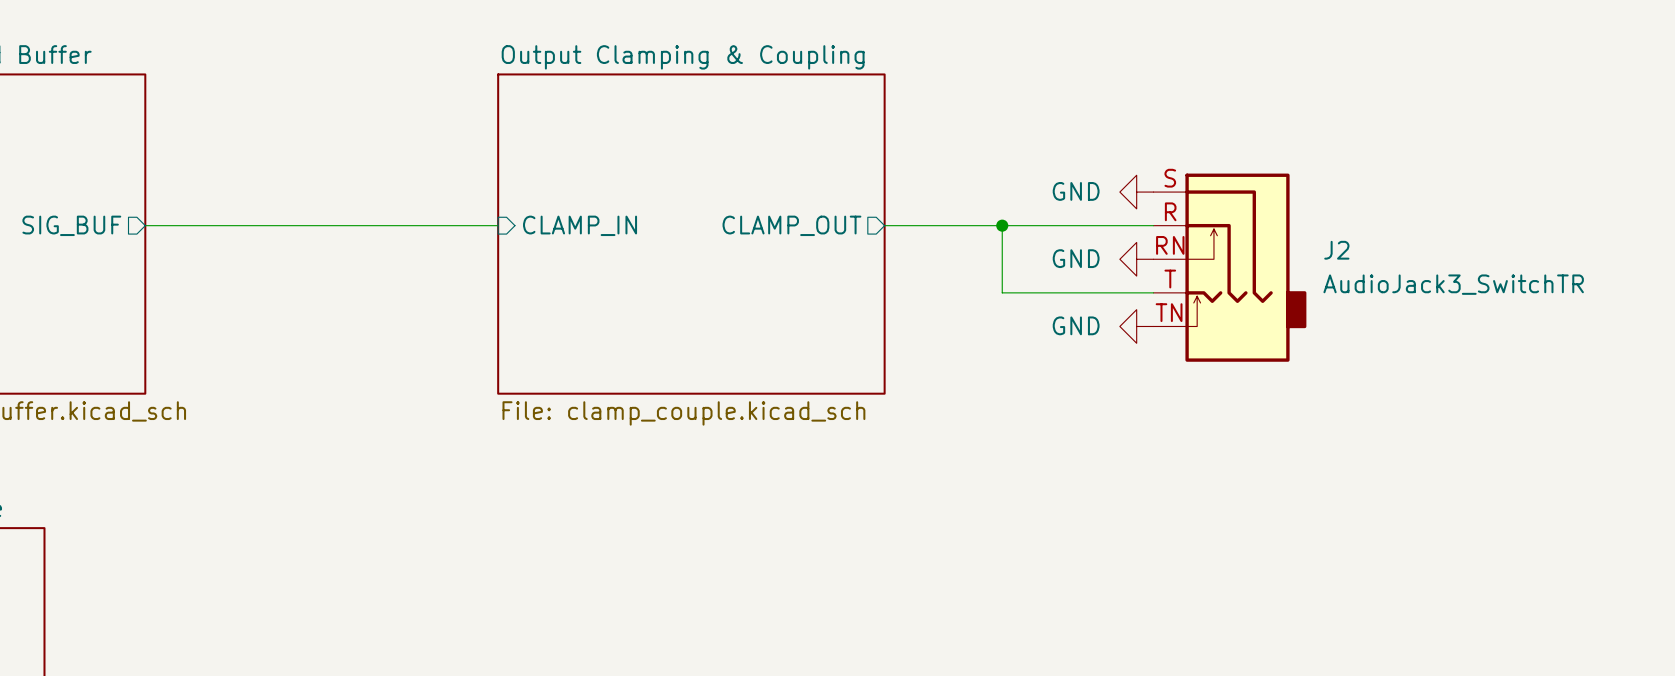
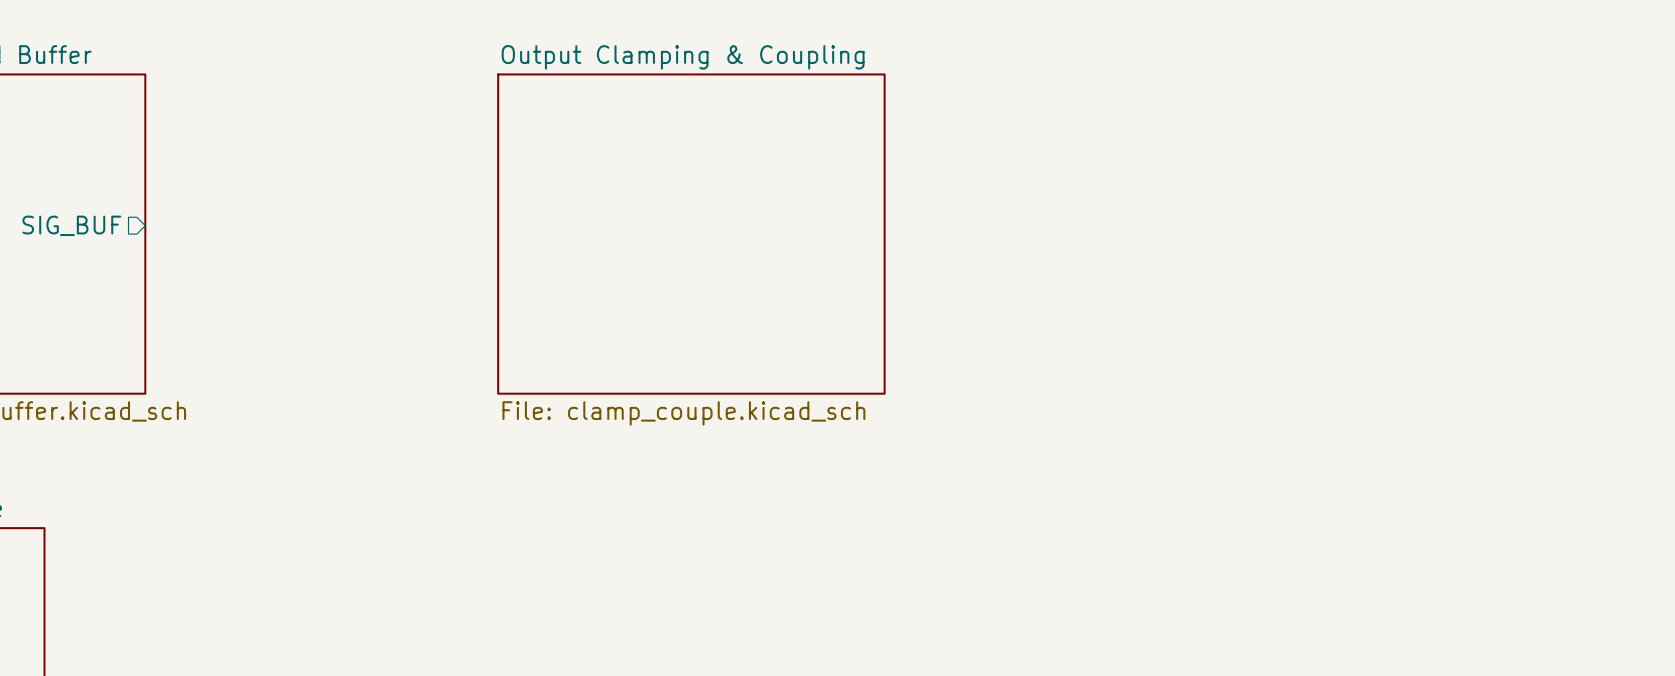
power symbol: GND (1136, 192) -> none
wire: (145, 225) (498, 225) -> none
sheet pin: CLAMP_IN (580, 225) -> none
sheet pin: CLAMP_OUT (791, 225) -> none
wire: (884, 225) (1153, 225) -> none
wire: (1002, 225) (1002, 292) (1153, 292) -> none
junction: (1002, 225) -> none
power symbol: GND (1136, 259) -> none
J2: AudioJack3_SwitchTR (1229, 267) -> none
power symbol: GND (1136, 326) -> none

